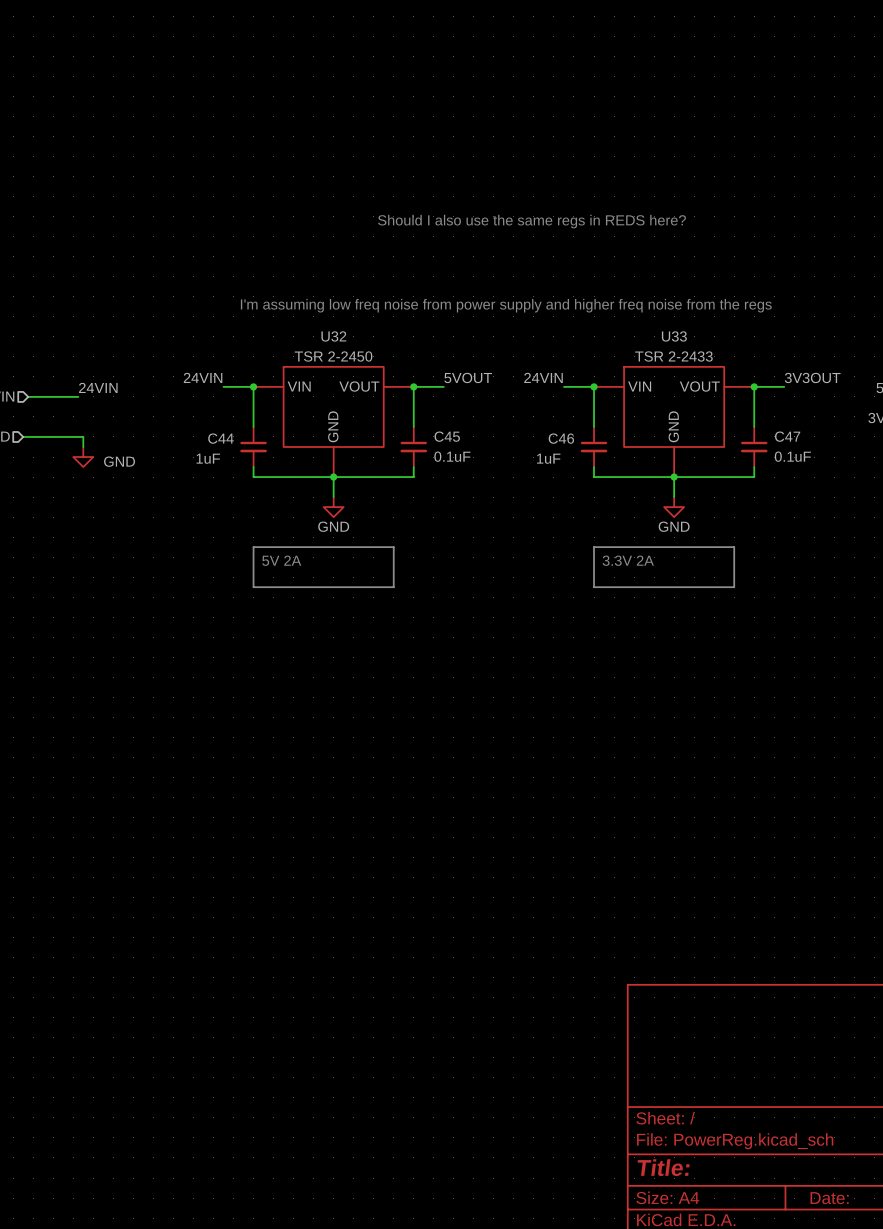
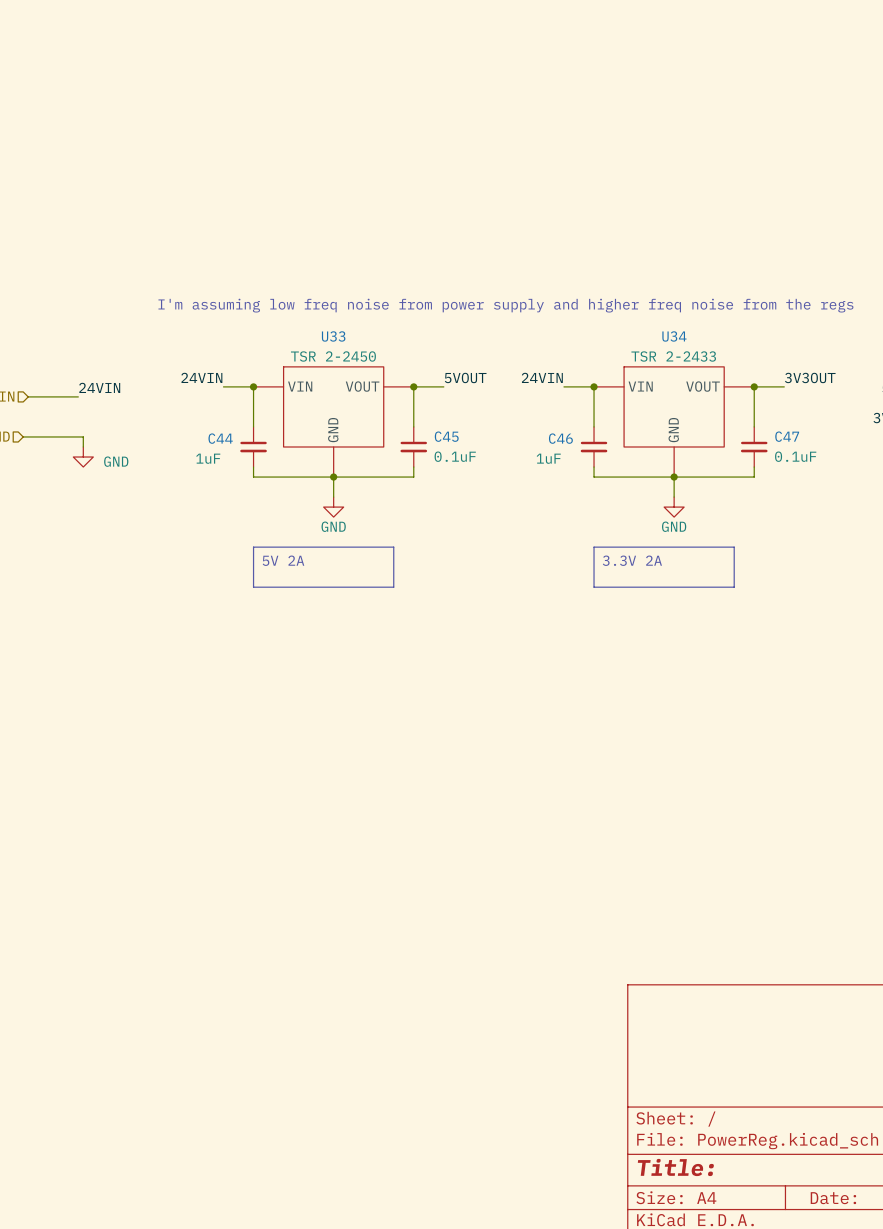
text: Should I also use the same regs in REDS here? (531, 221) -> none
U32 name: U32 (333, 336) -> U33 (333, 336)
U33 name: U33 (674, 336) -> U34 (674, 336)

